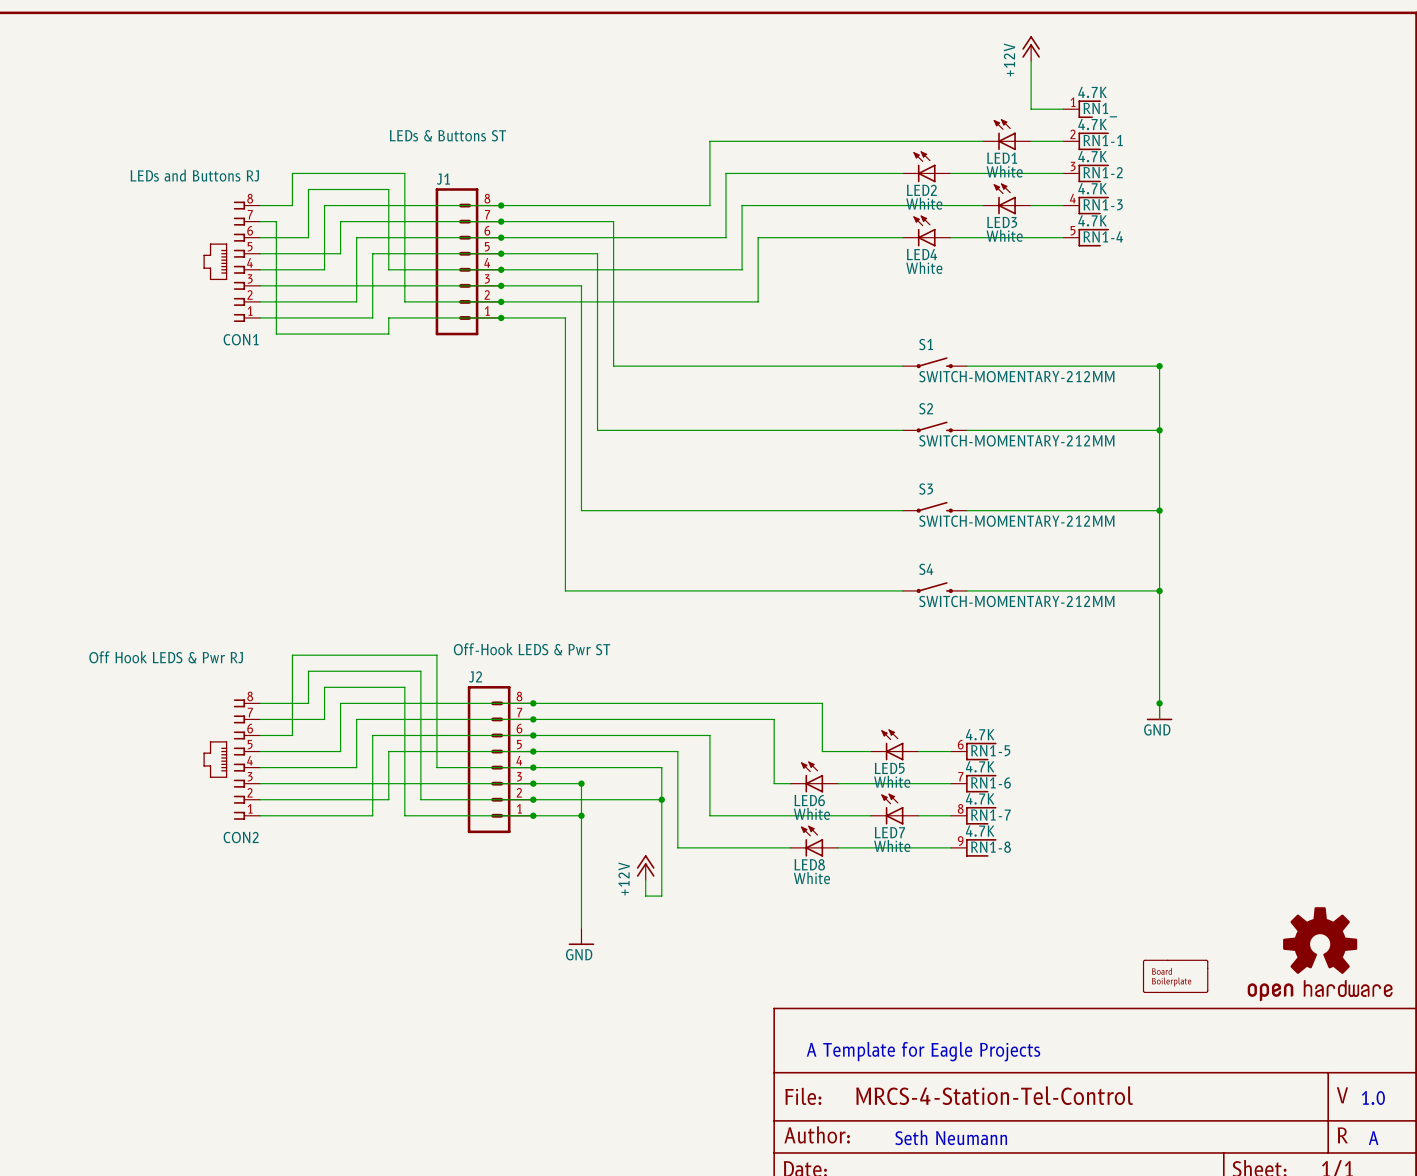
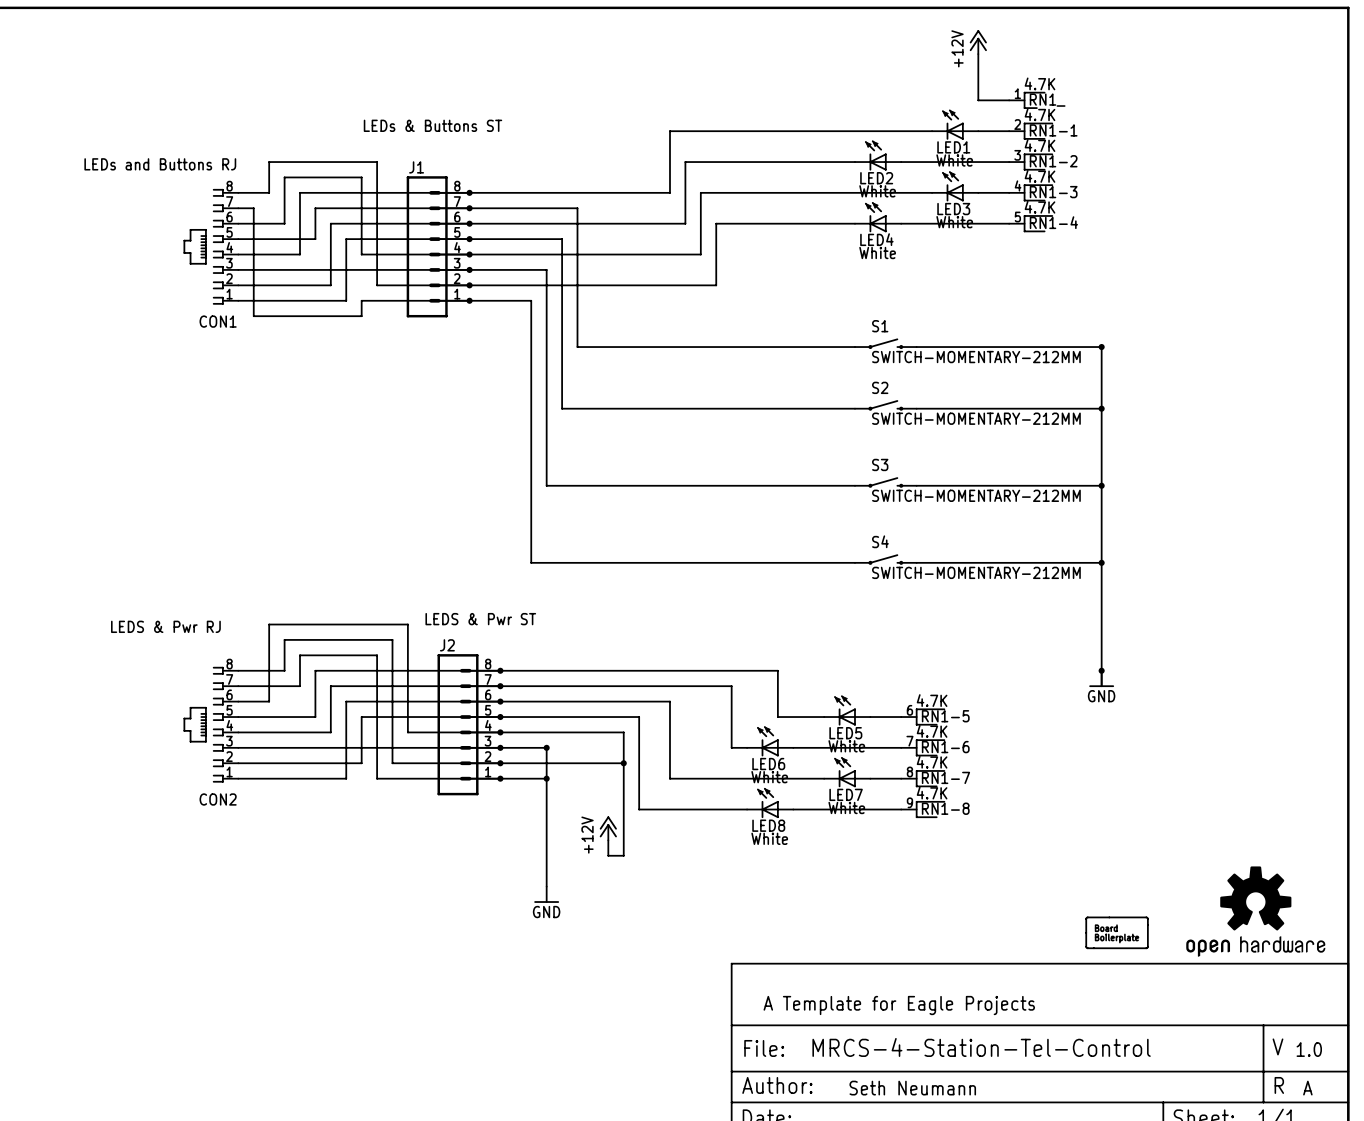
J2 value: Off-Hook LEDS & Pwr ST (532, 649) -> LEDS & Pwr ST (480, 619)
CON2 value: Off Hook LEDS & Pwr RJ (166, 657) -> LEDS & Pwr RJ (165, 626)

